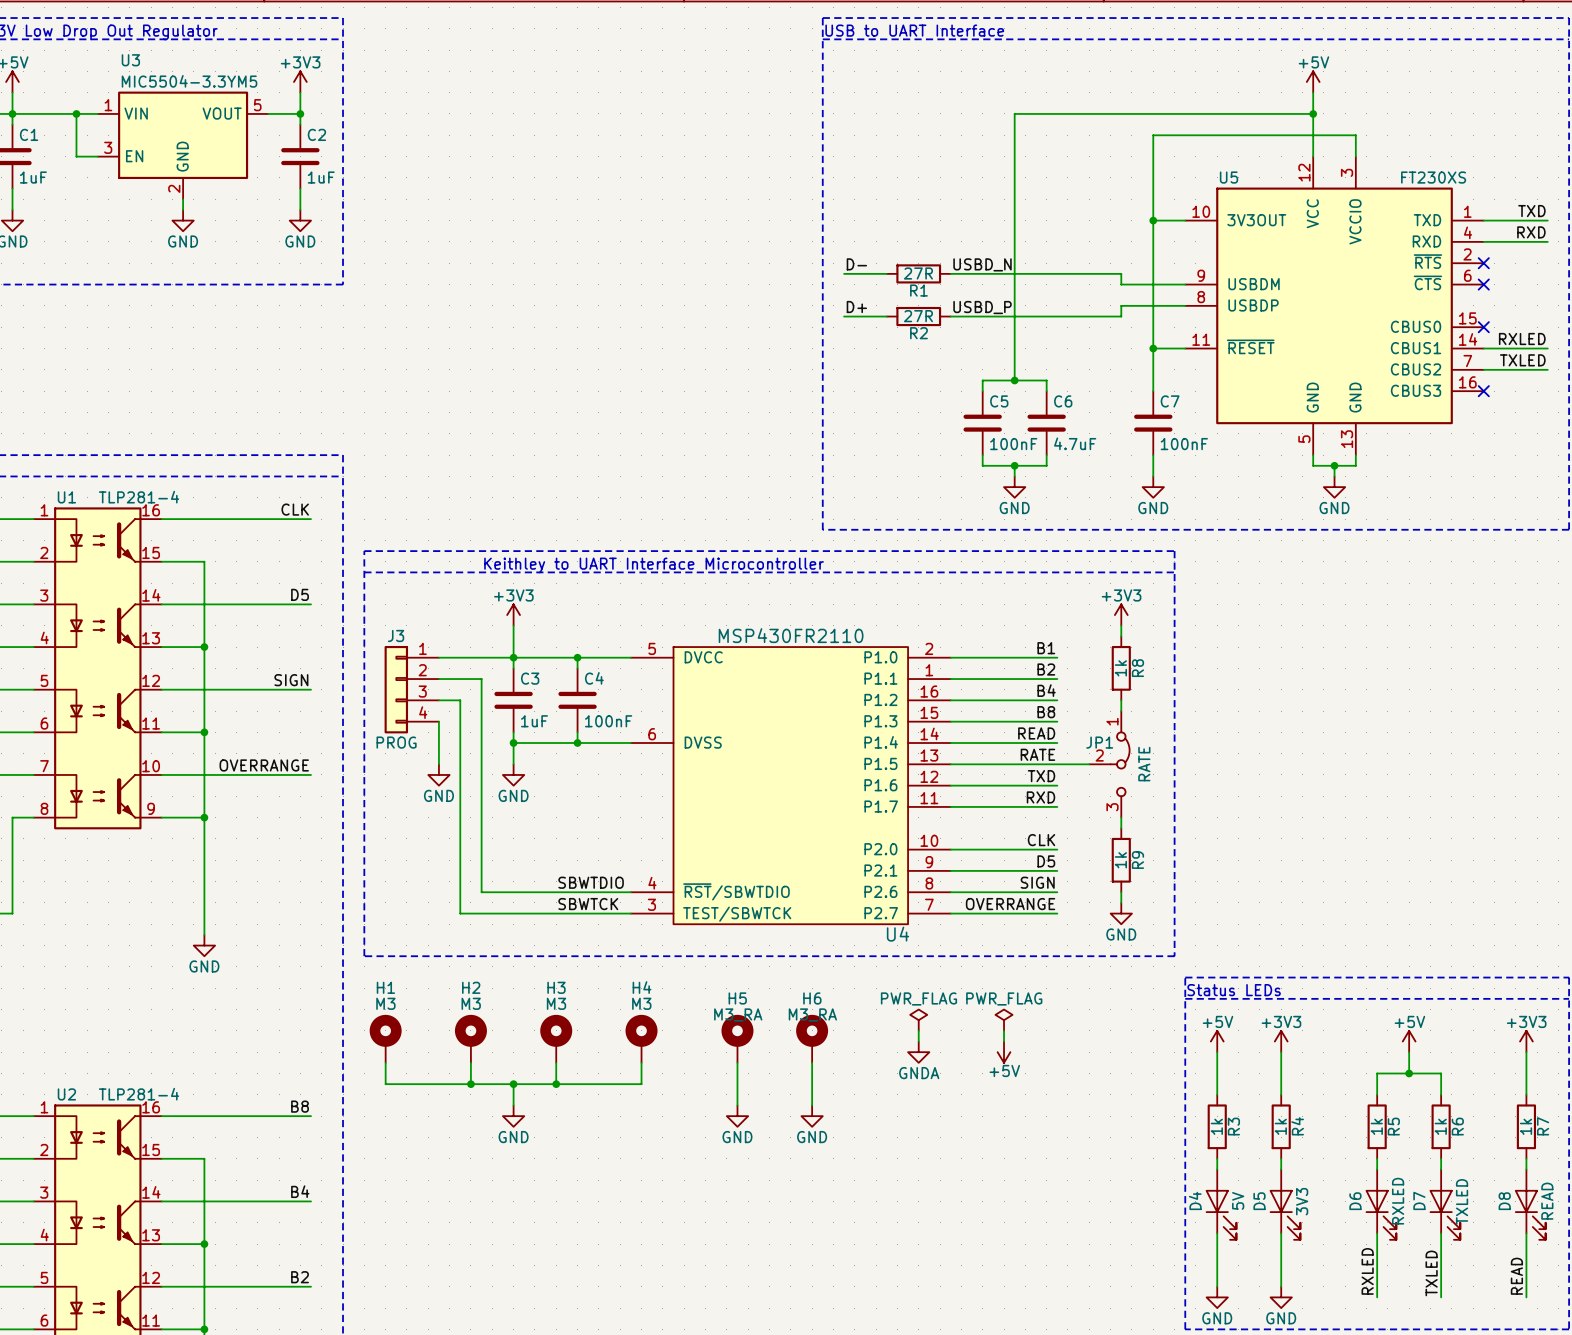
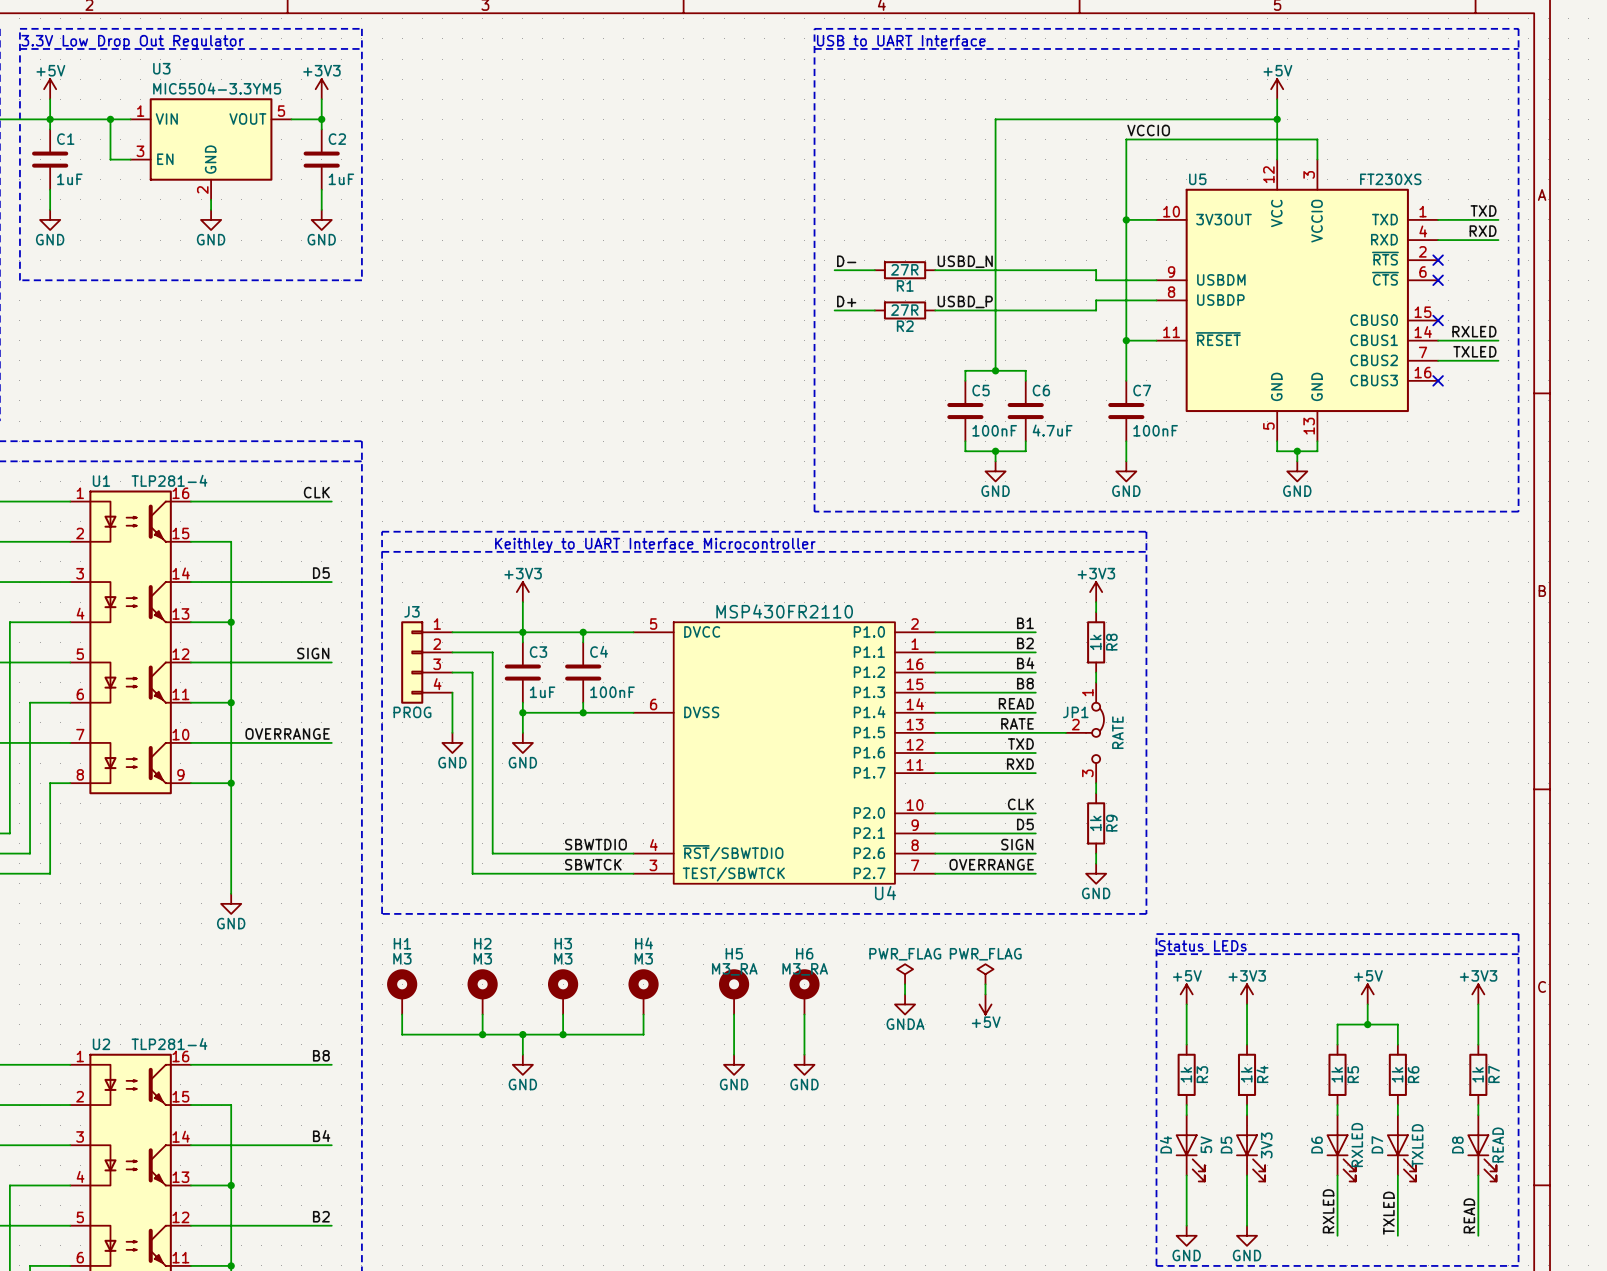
label: none -> VCCIO (1148, 130)

